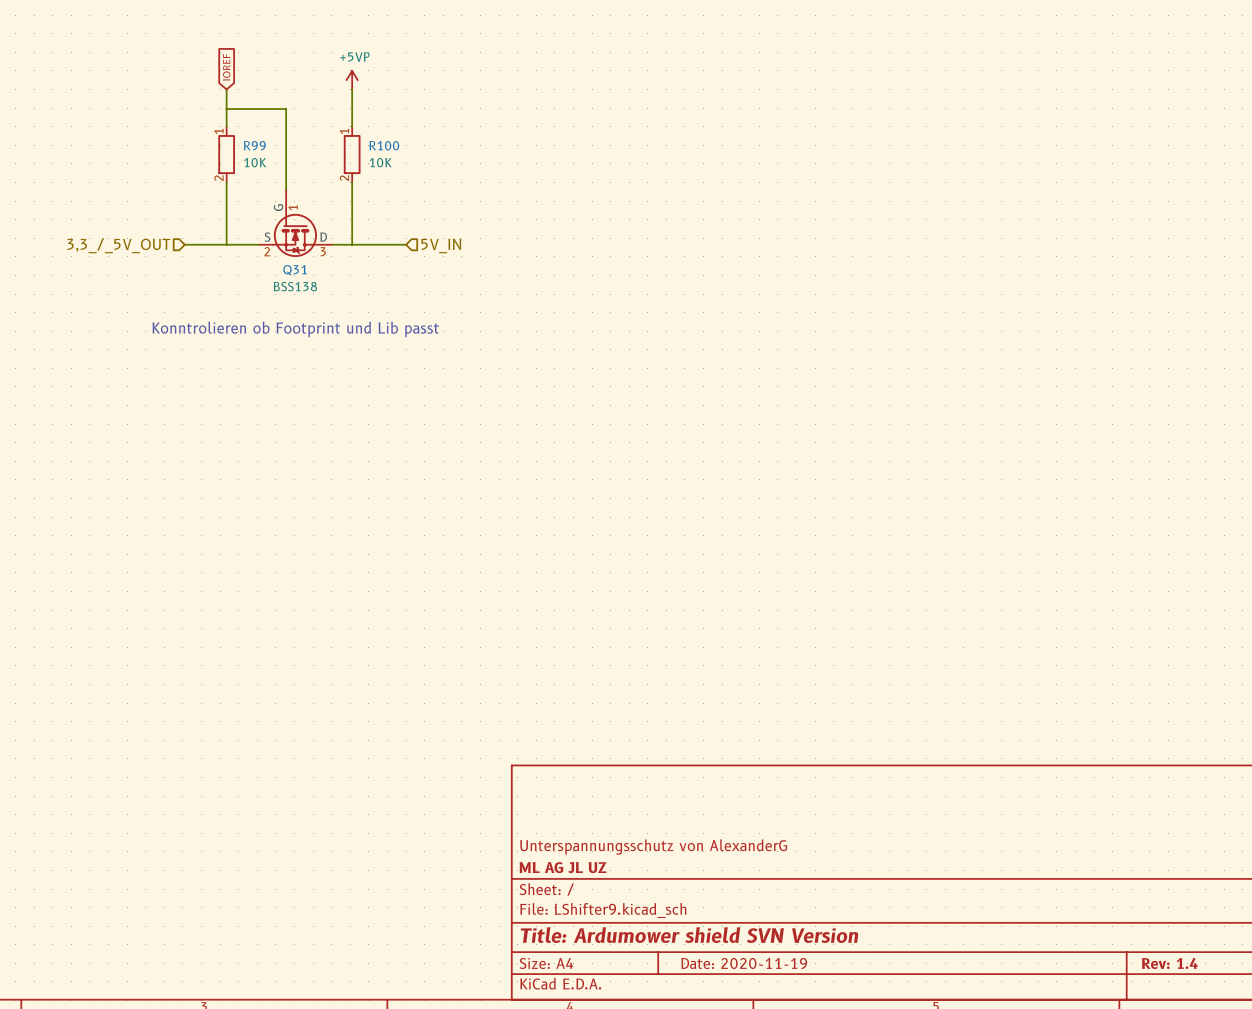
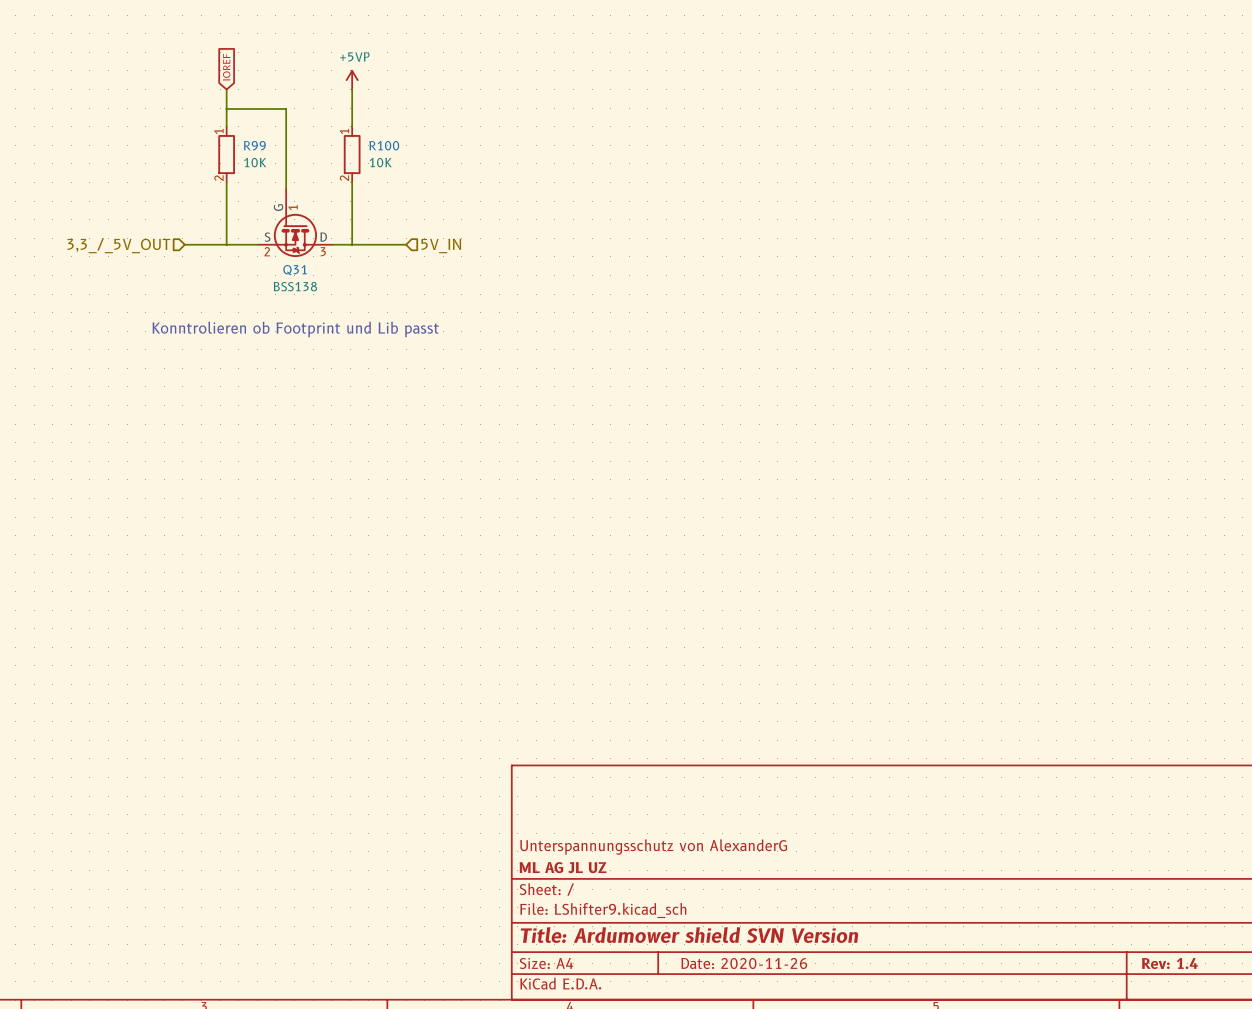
title block: Date: 2020-11-19 (744, 963) -> Date: 2020-11-26 (744, 963)

